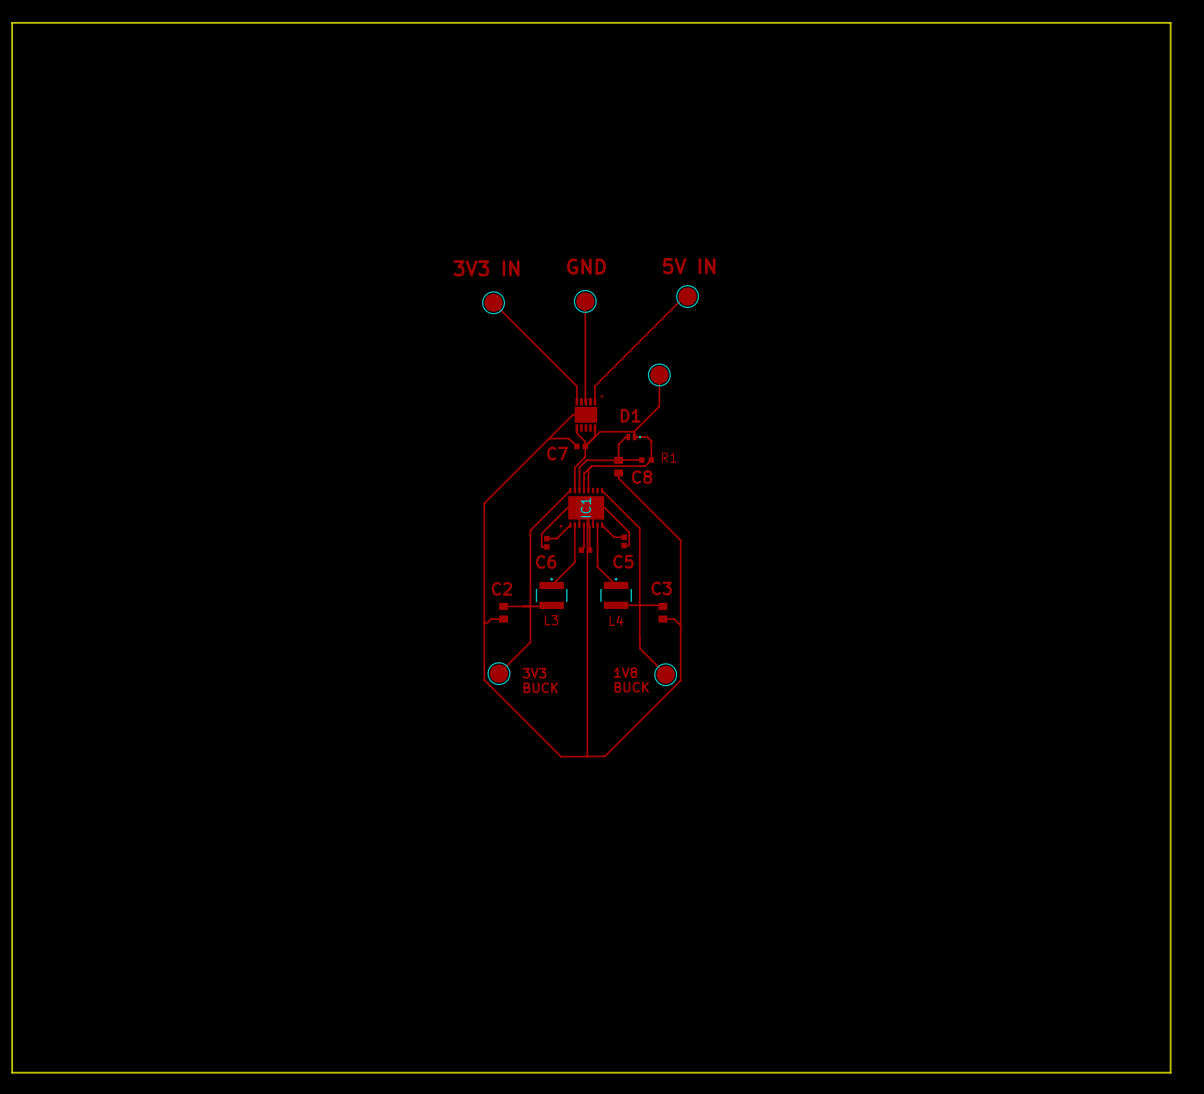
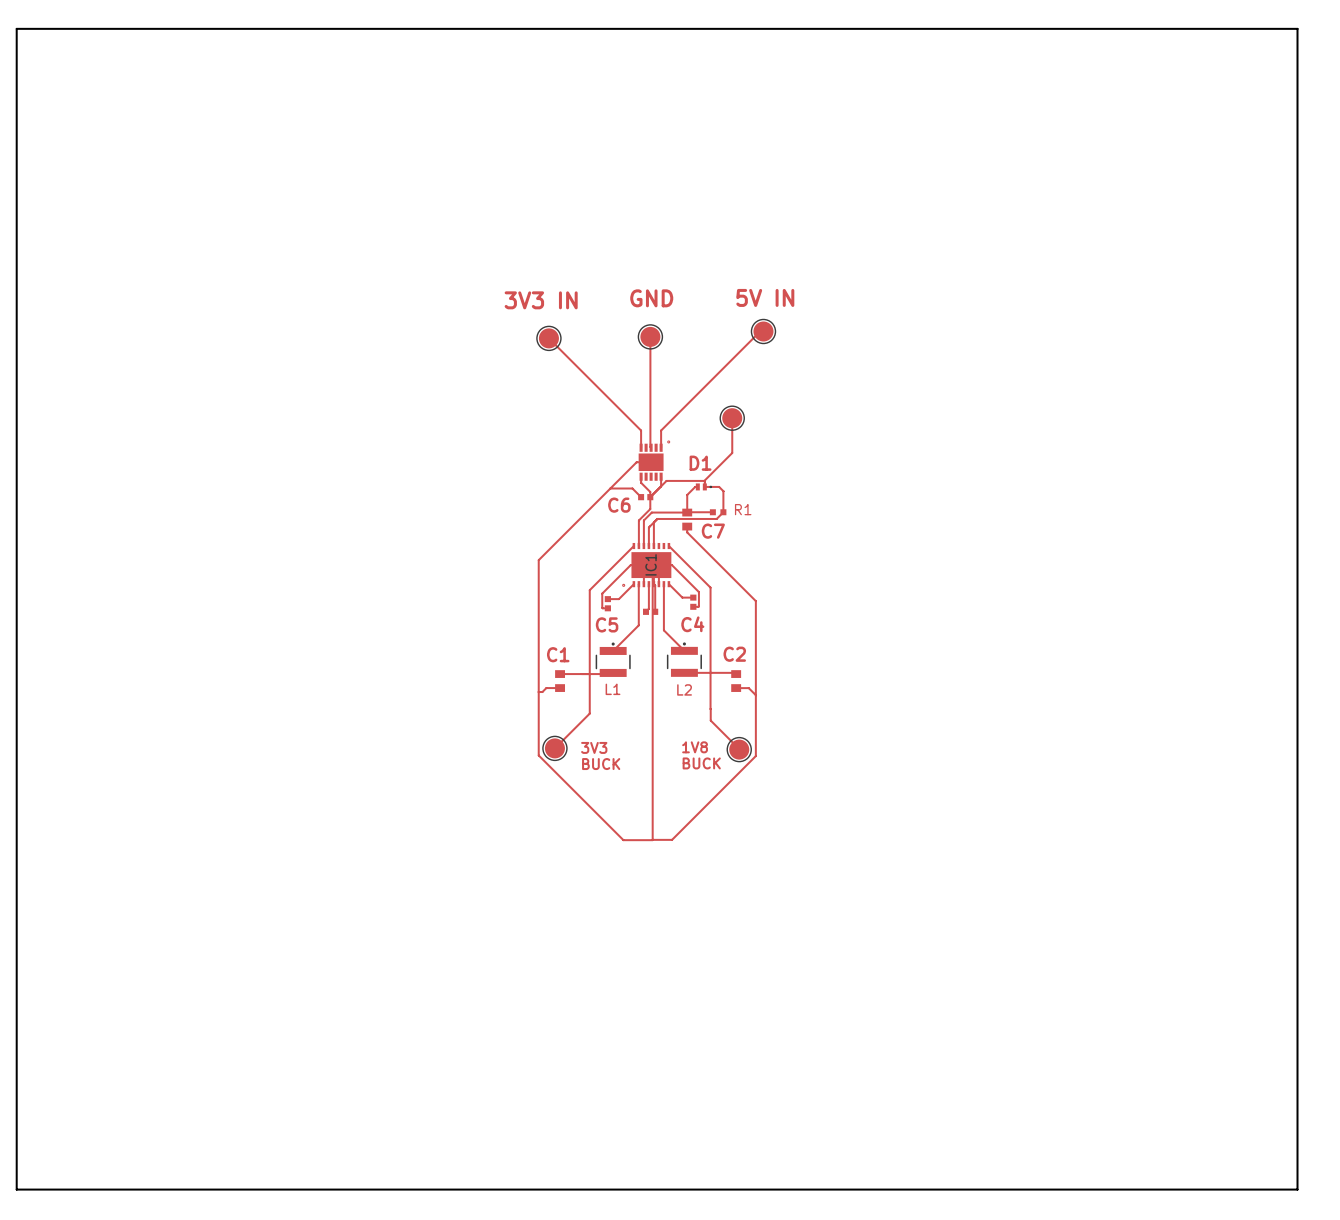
C7 name: C7 (557, 453) -> C6 (619, 505)
C8 name: C8 (641, 477) -> C7 (713, 531)
C6 name: C6 (546, 561) -> C5 (607, 624)
C5 name: C5 (623, 561) -> C4 (692, 624)
C2 name: C2 (501, 588) -> C1 (558, 654)
C3 name: C3 (661, 588) -> C2 (734, 654)
L3 name: L3 (551, 620) -> L1 (613, 689)
L4 name: L4 (616, 620) -> L2 (684, 689)

